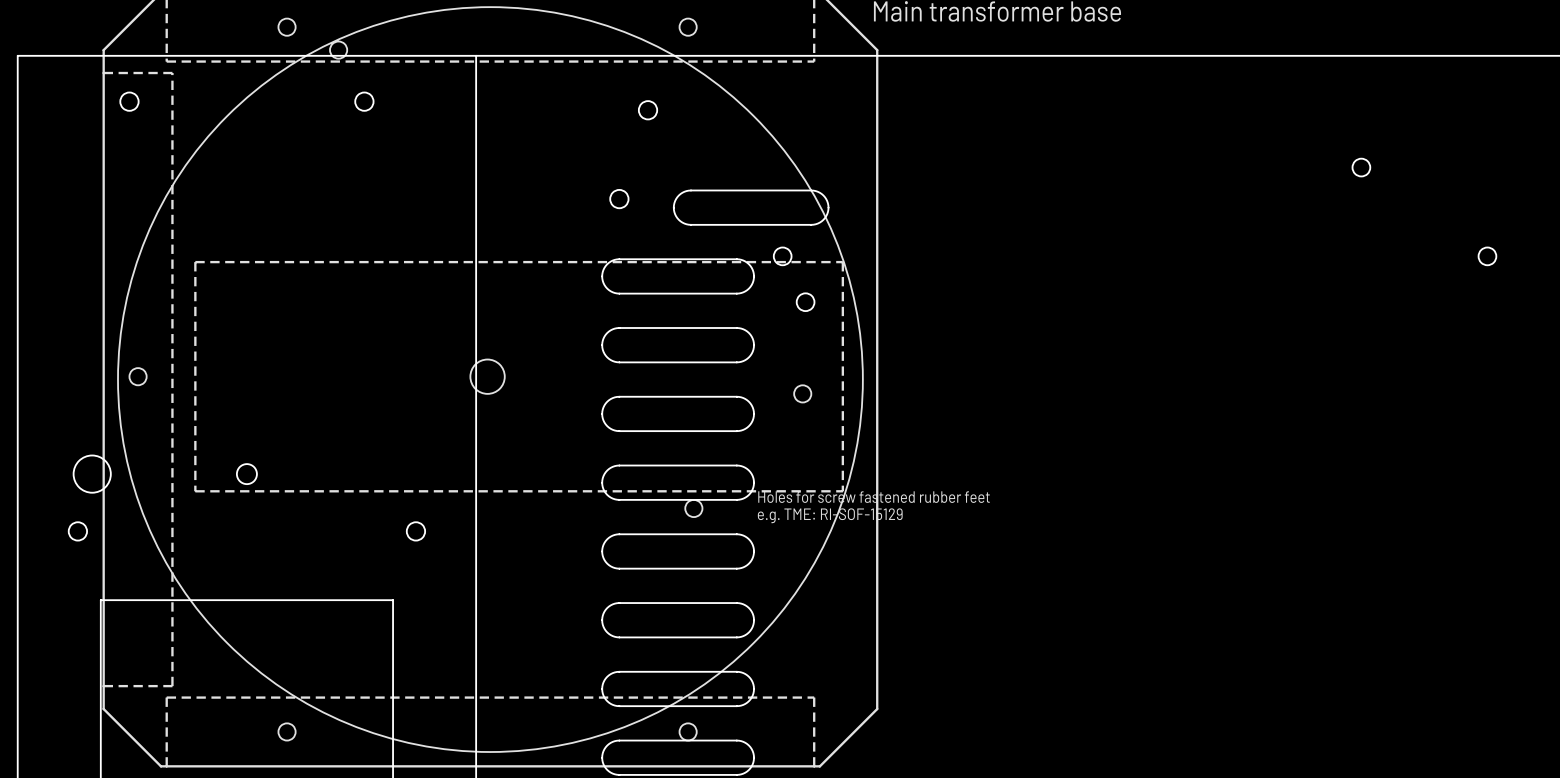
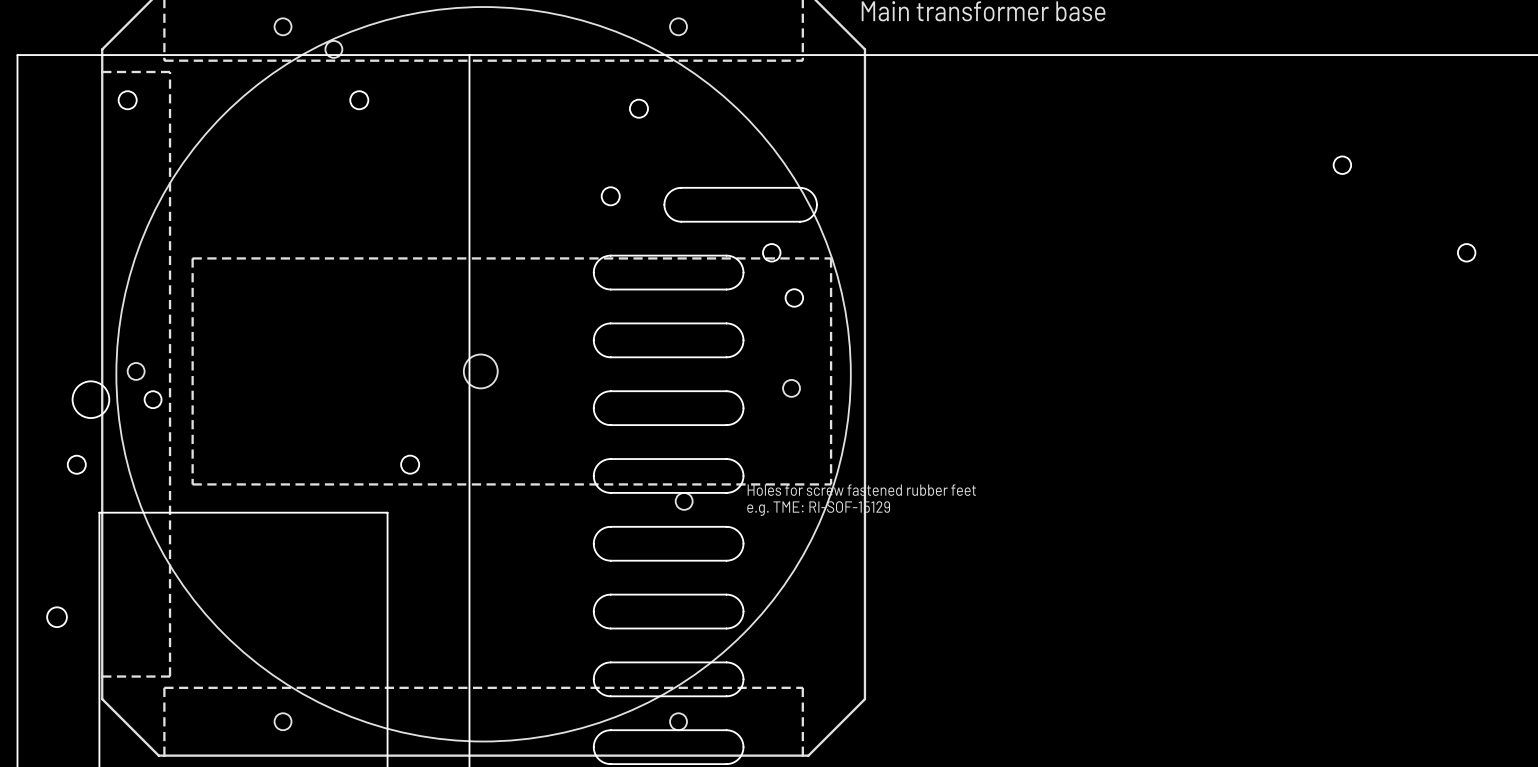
round board edge: none -> [144, 390, 162, 409]
round board edge: [236, 463, 258, 485] -> none
round board edge position: (92, 474) -> (90, 399)
round board edge position: (77, 531) -> (76, 464)
round board edge position: (415, 531) -> (410, 464)
board edge: (100, 600) (393, 600) -> (99, 591) (99, 512) (387, 512) (387, 591)
round board edge: none -> [46, 607, 68, 628]

